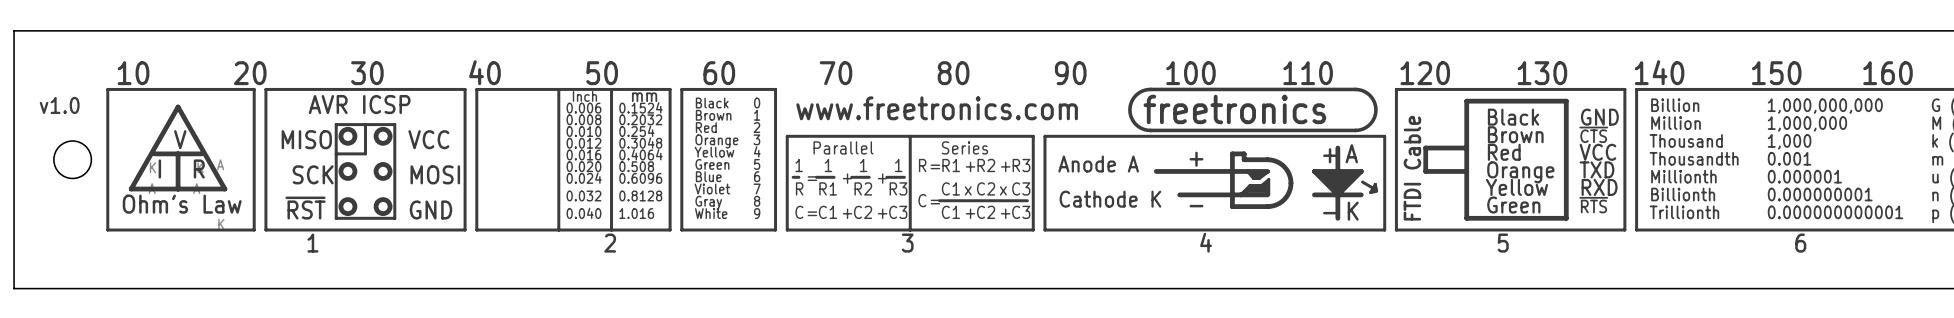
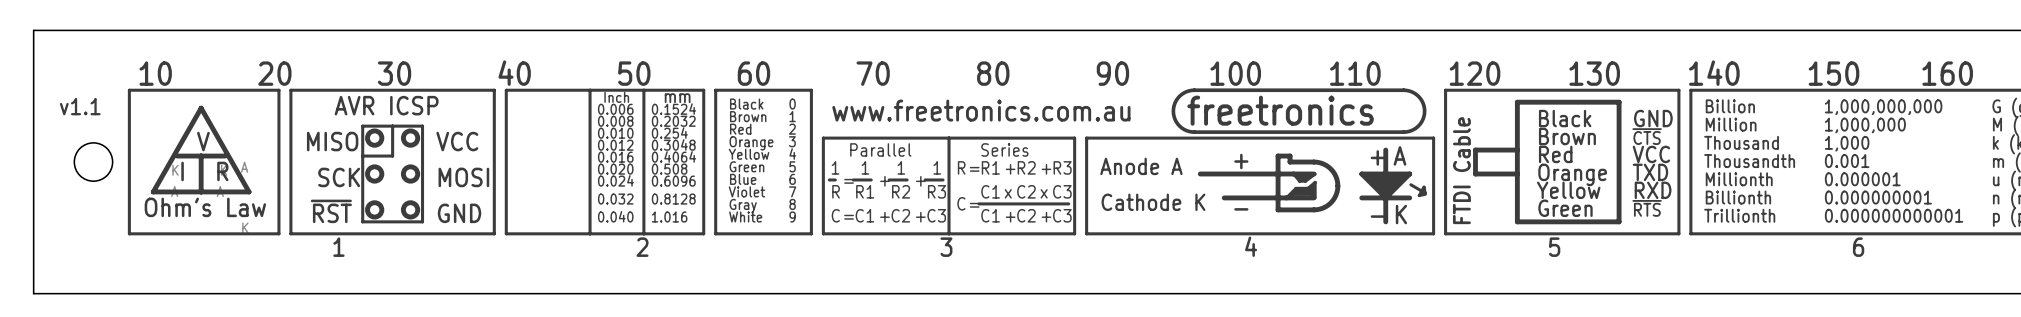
text: v1.0 (59, 105) -> v1.1 (80, 106)
text: www.freetronics.com (937, 108) -> www.freetronics.com.au (981, 110)

